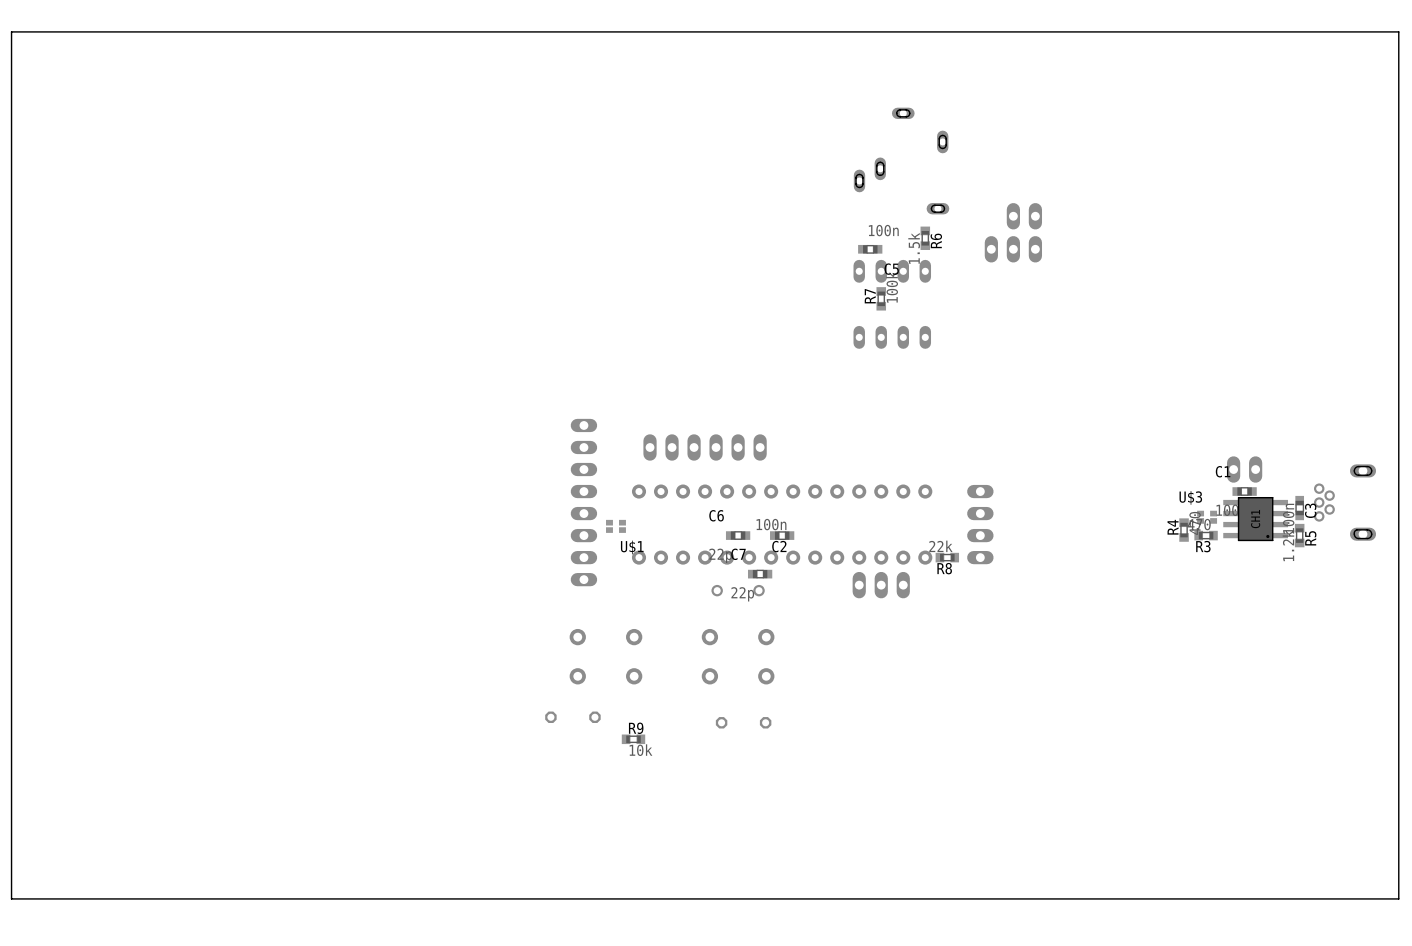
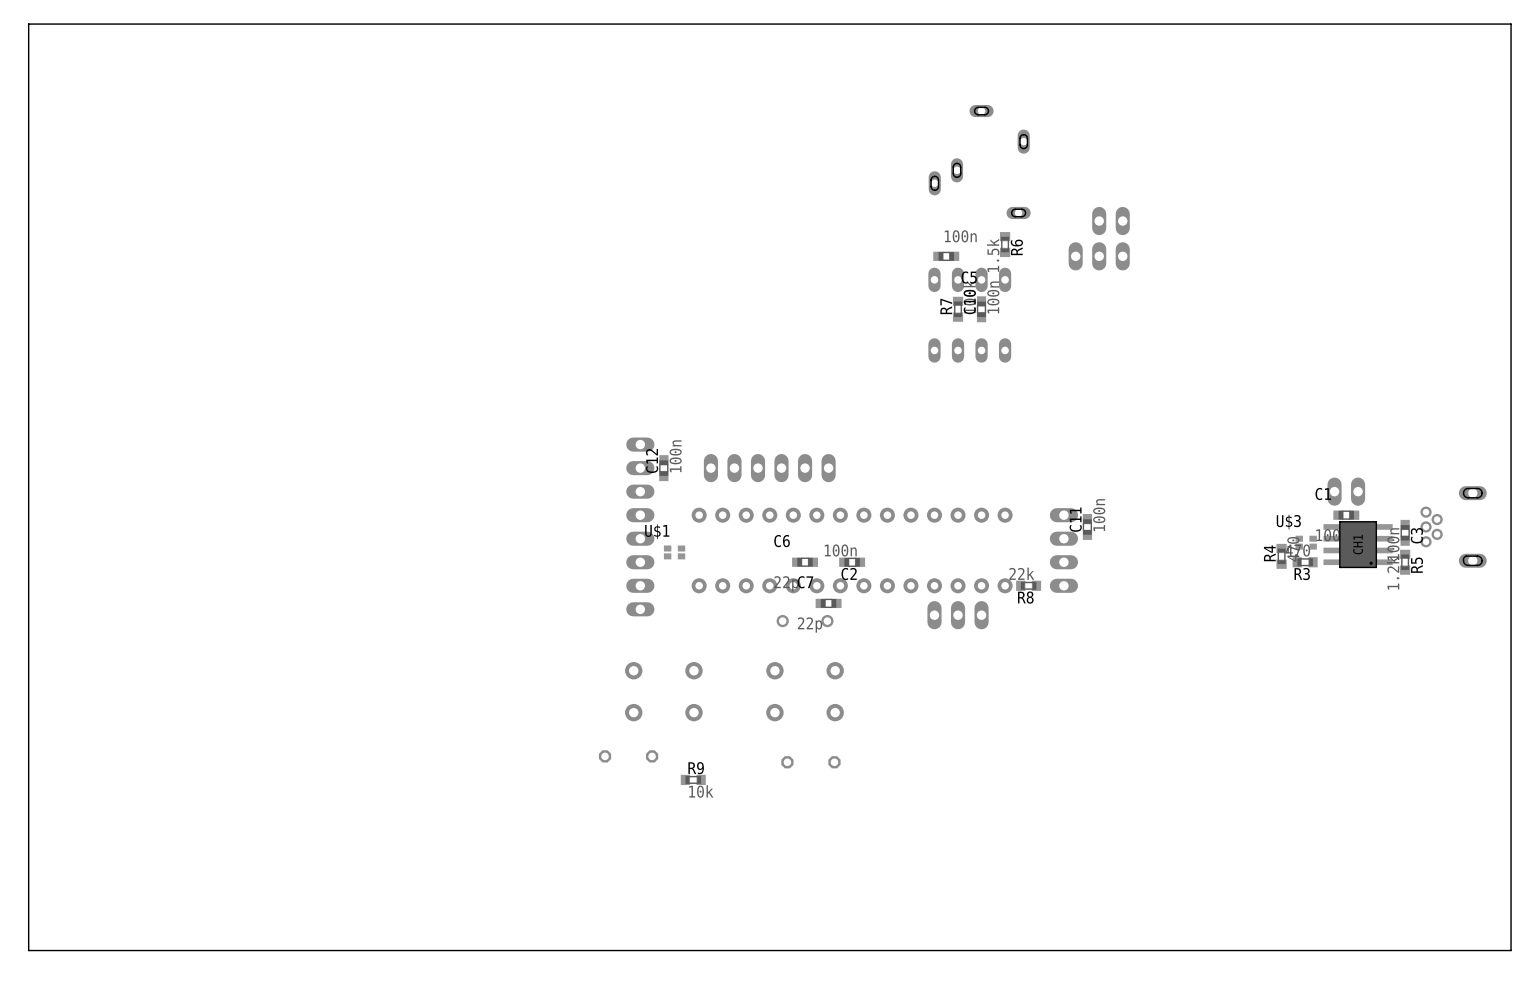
C10: none -> 100n (981, 309)
C12: none -> 100n (663, 468)
C11: none -> 100n (1087, 526)
U$1 name position: U$1 (632, 547) -> U$1 (657, 531)

